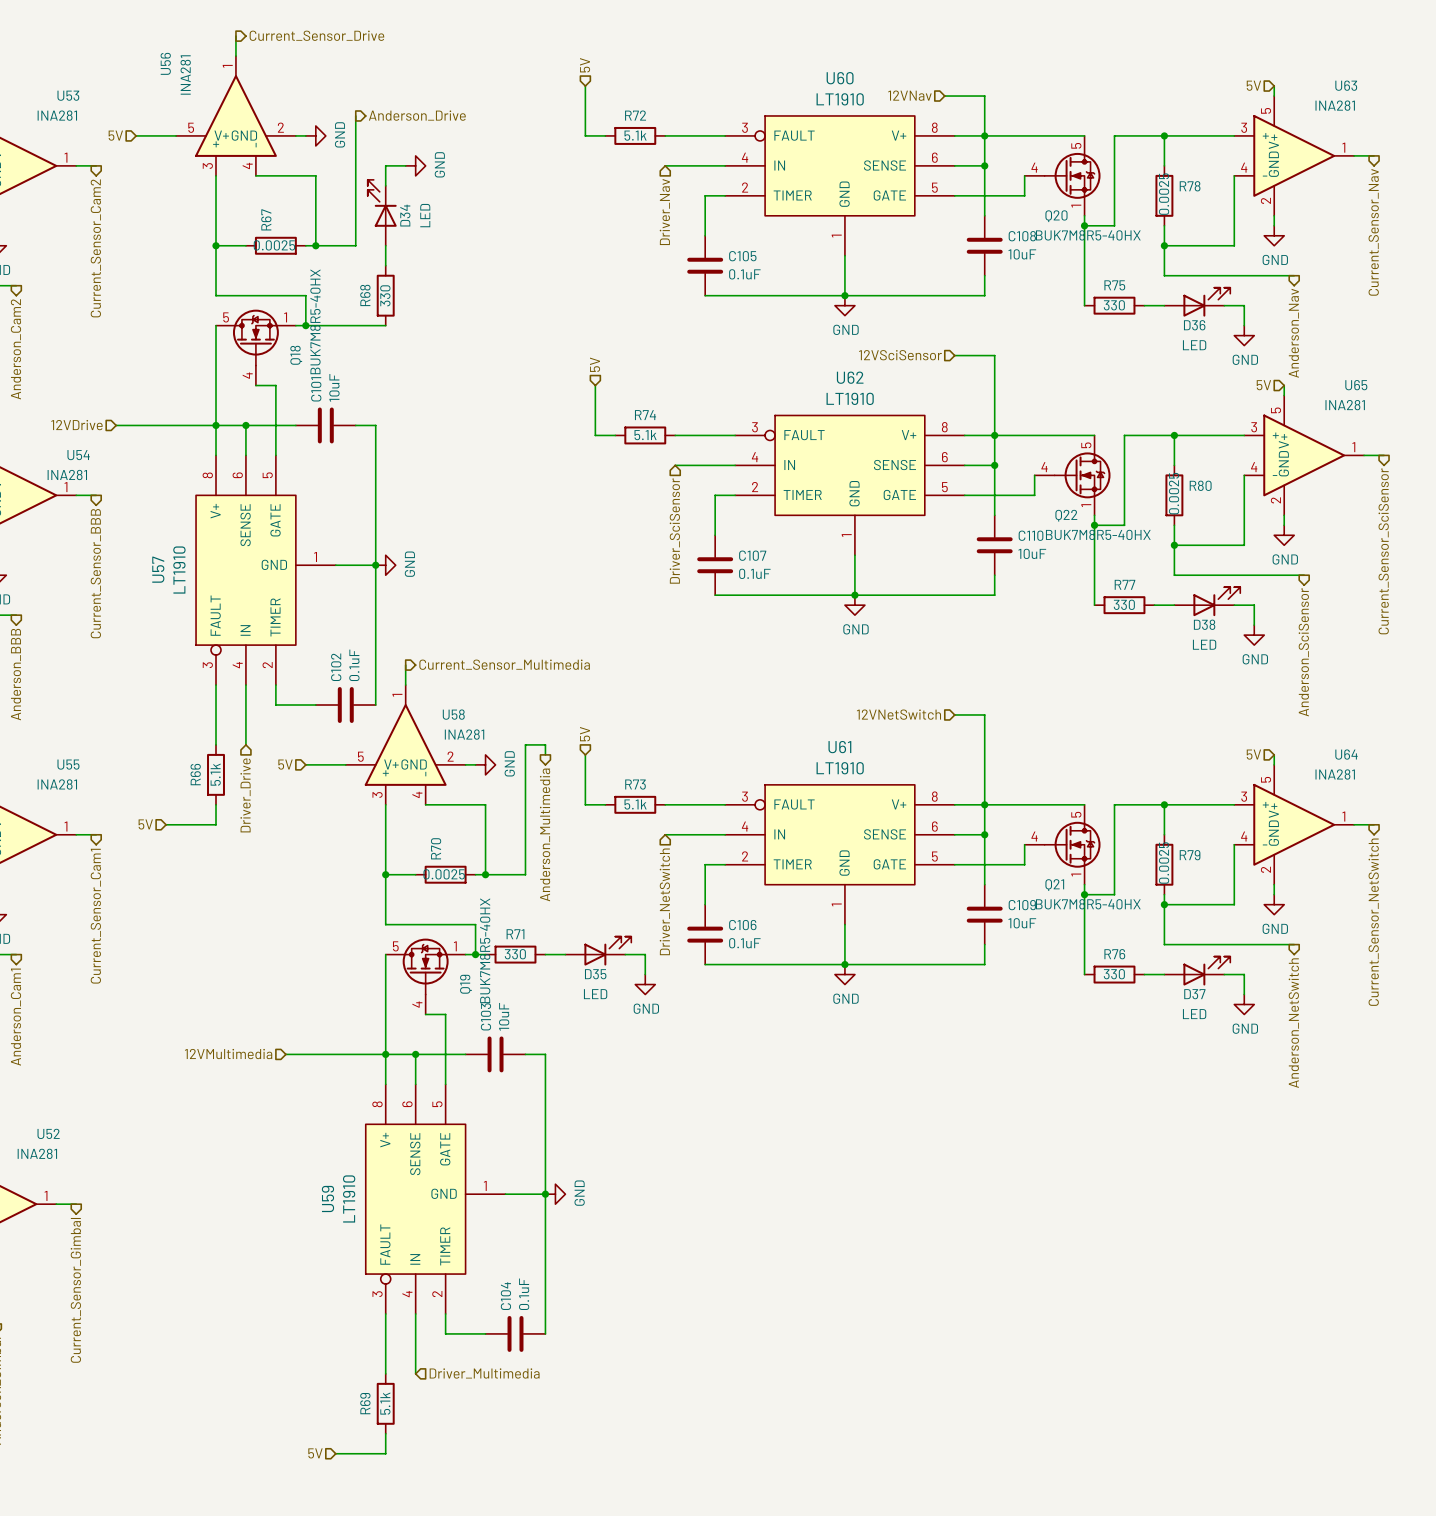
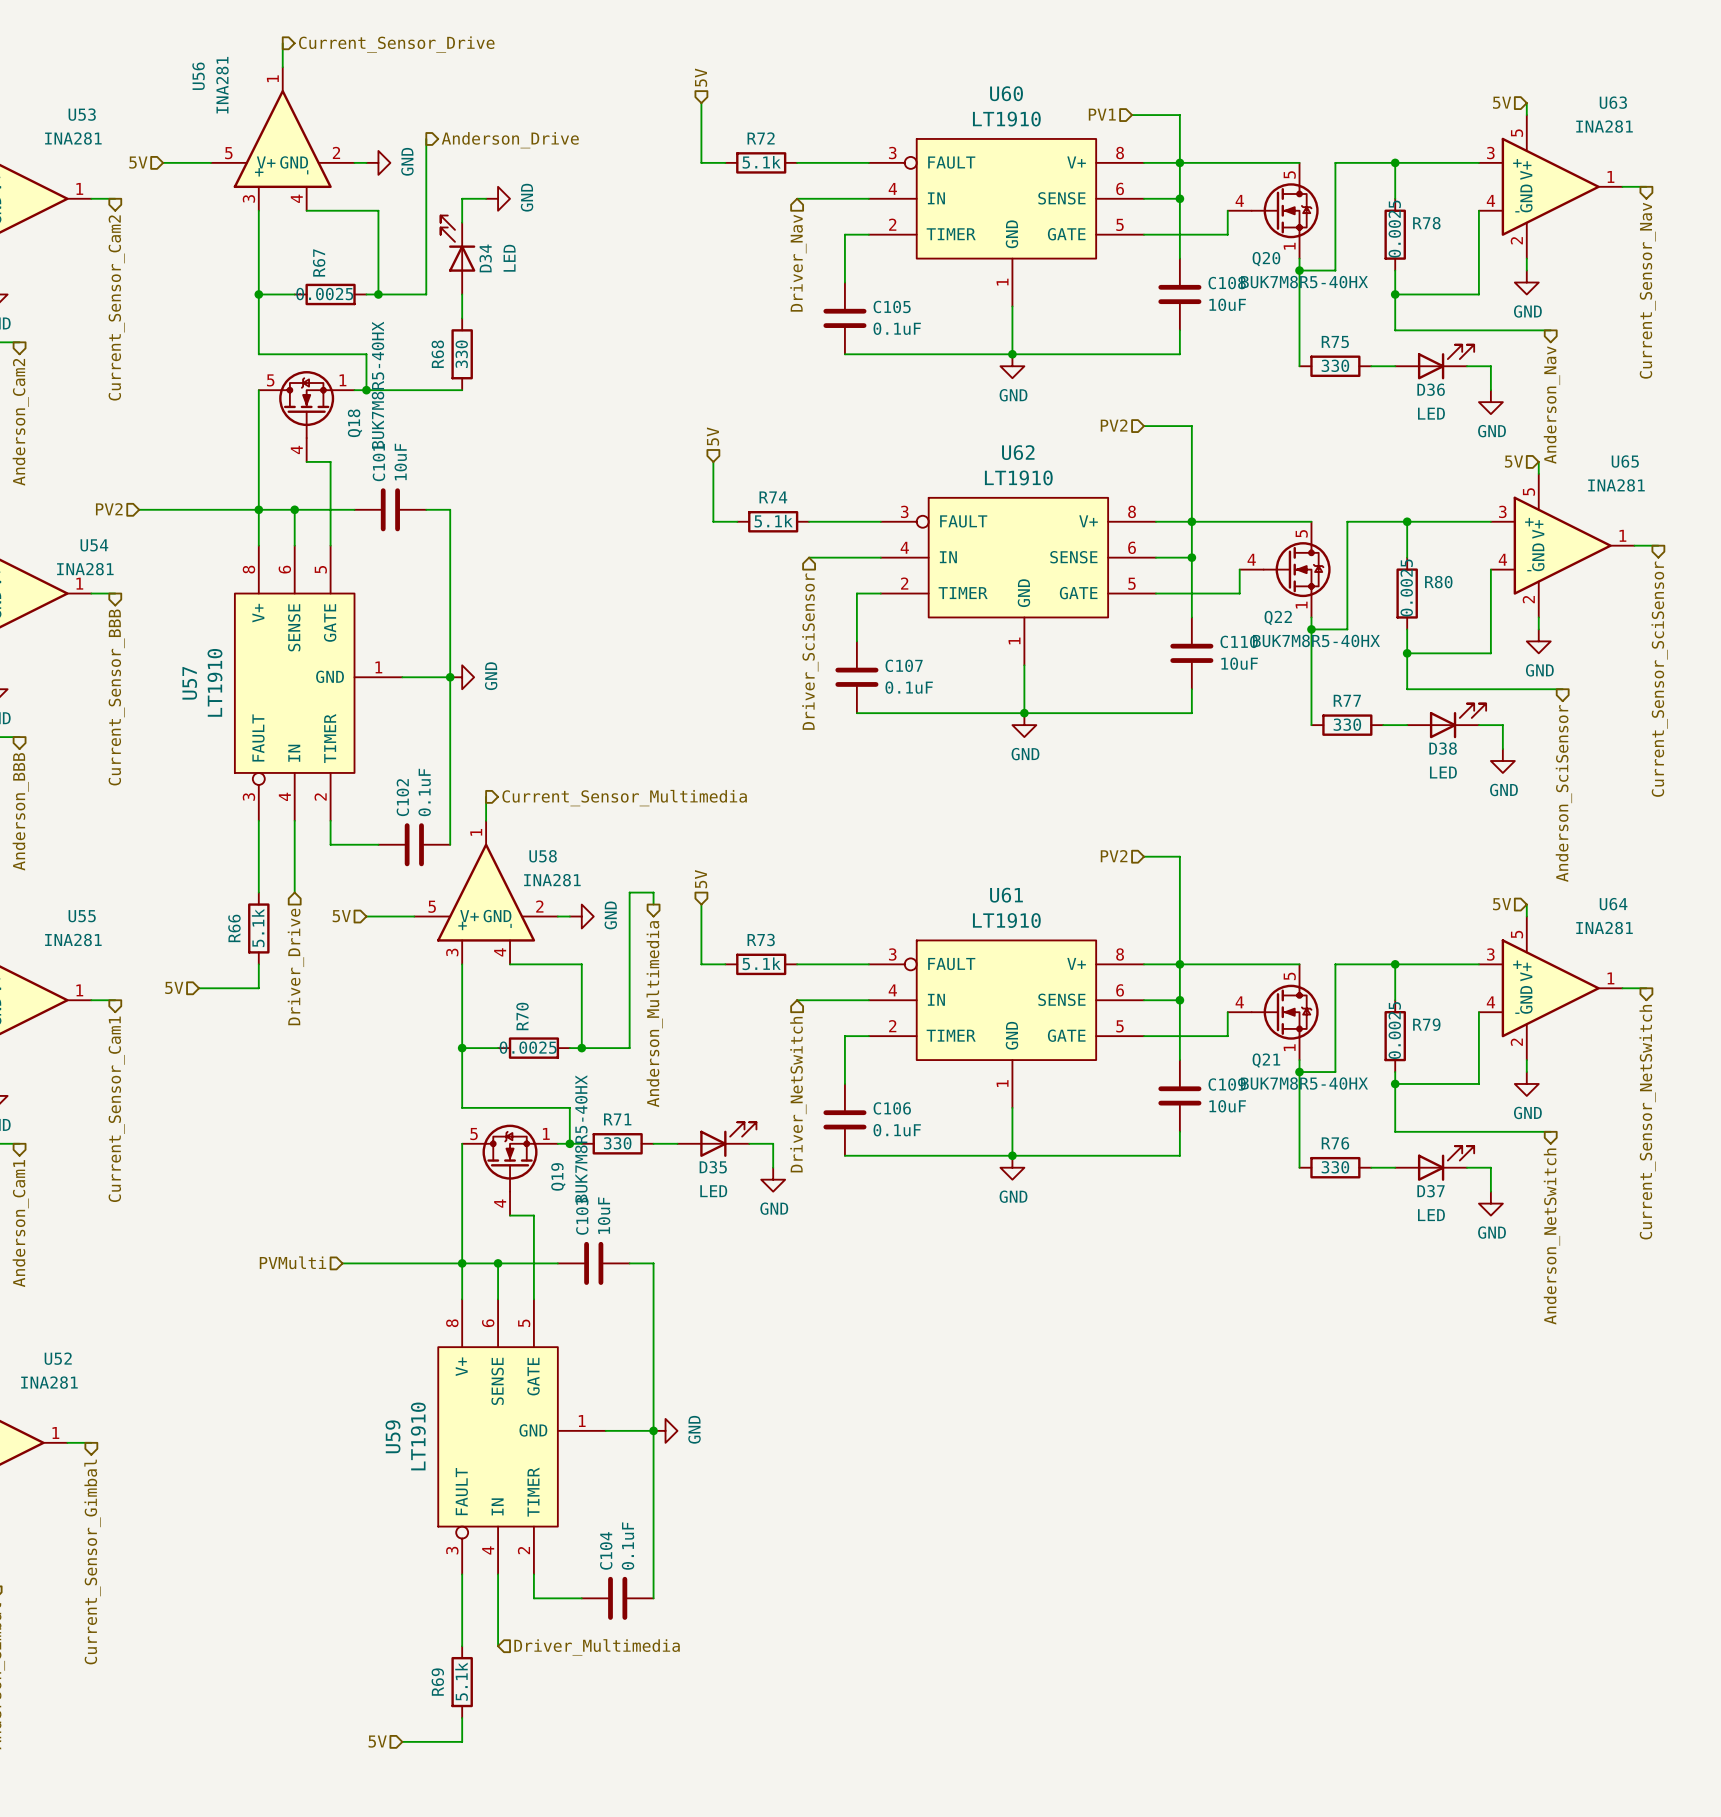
hierarchical label: 12VNav (909, 95) -> PV1 (1102, 114)
hierarchical label: 12VSciSensor (900, 355) -> PV2 (1114, 425)
hierarchical label: 12VDrive (76, 425) -> PV2 (109, 509)
hierarchical label: 12VNetSwitch (898, 714) -> PV2 (1114, 856)
hierarchical label: 12VMultimedia (228, 1054) -> PVMulti (293, 1262)

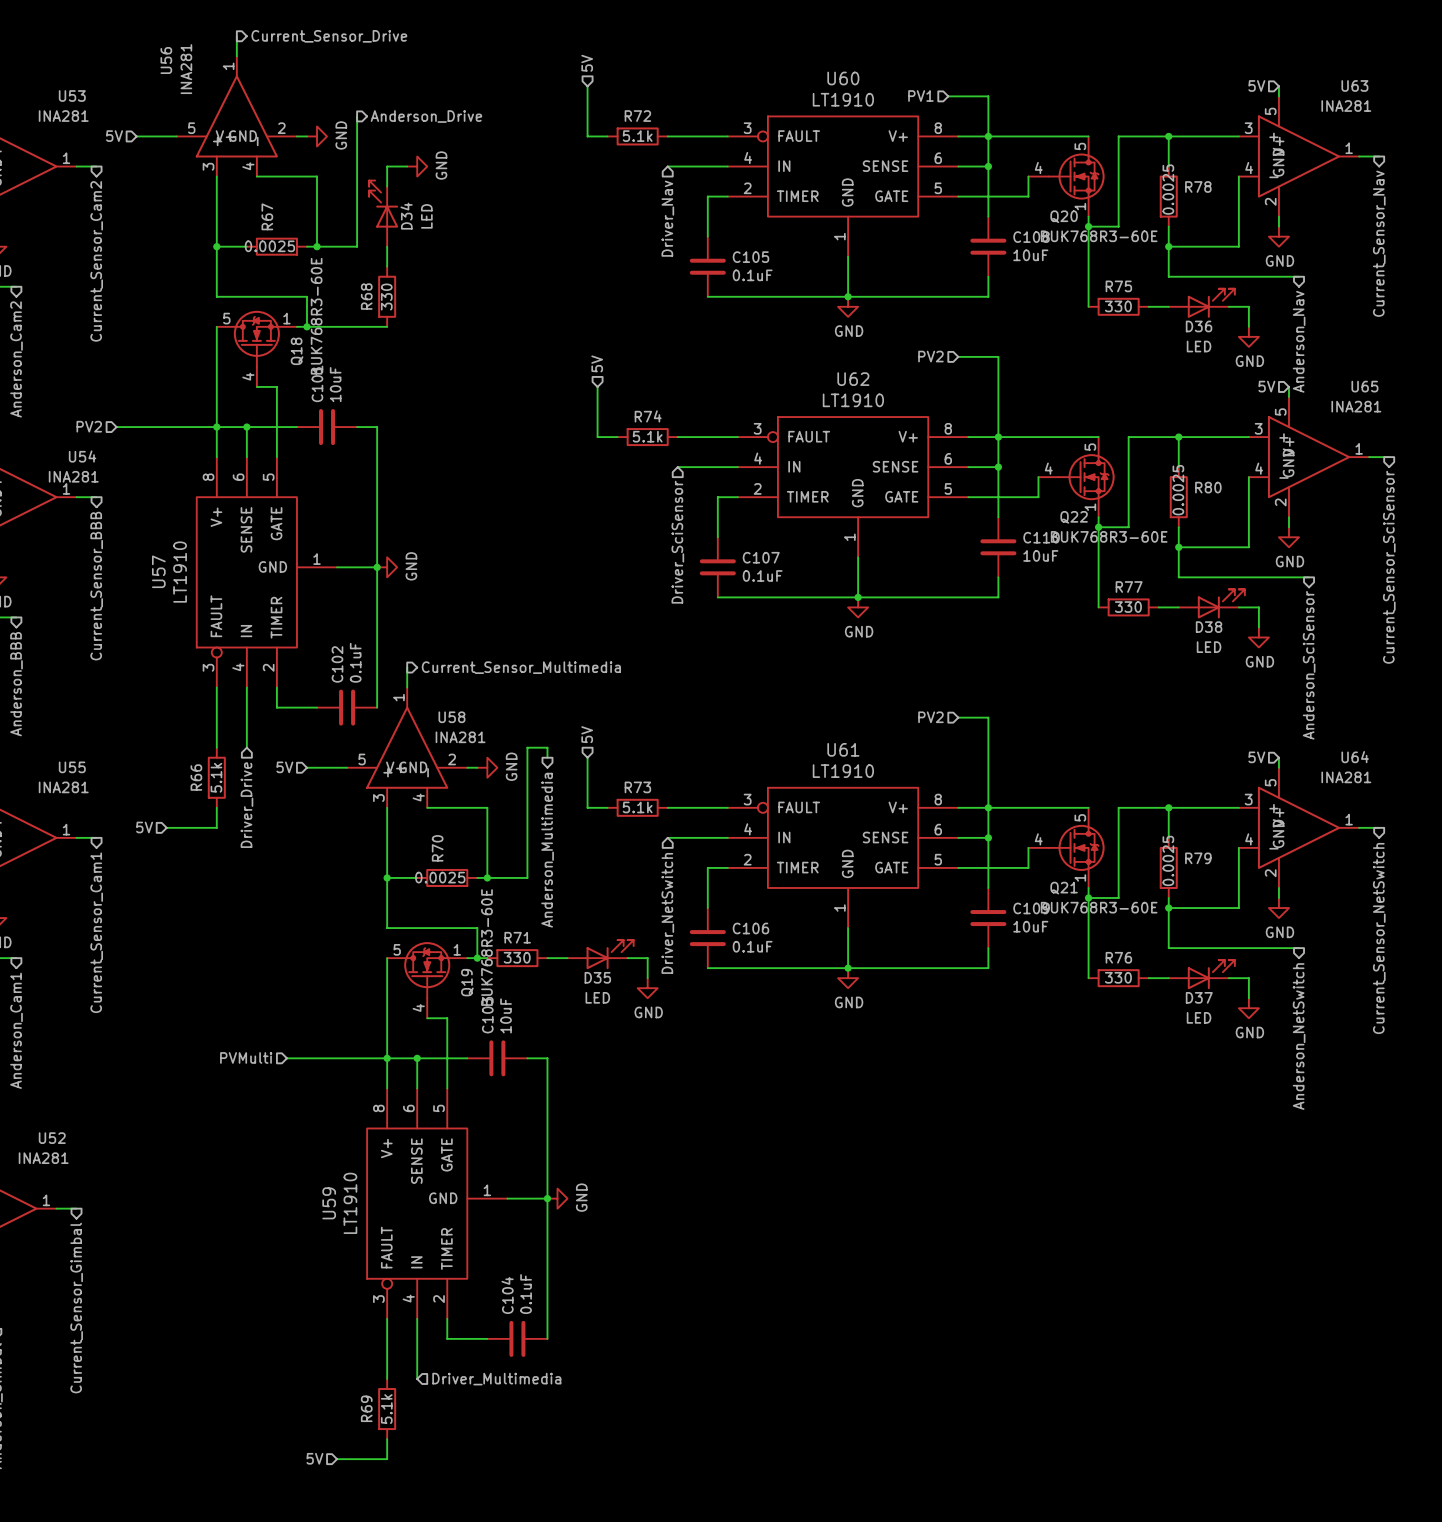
Q20 value: BUK7M8R5-40HX (1304, 282) -> BUK768R3-60E (1099, 236)
Q18 value: BUK7M8R5-40HX (377, 385) -> BUK768R3-60E (316, 316)
Q22 value: BUK7M8R5-40HX (1316, 640) -> BUK768R3-60E (1109, 536)
Q21 value: BUK7M8R5-40HX (1304, 1083) -> BUK768R3-60E (1099, 907)
Q19 value: BUK7M8R5-40HX (581, 1138) -> BUK768R3-60E (486, 947)

